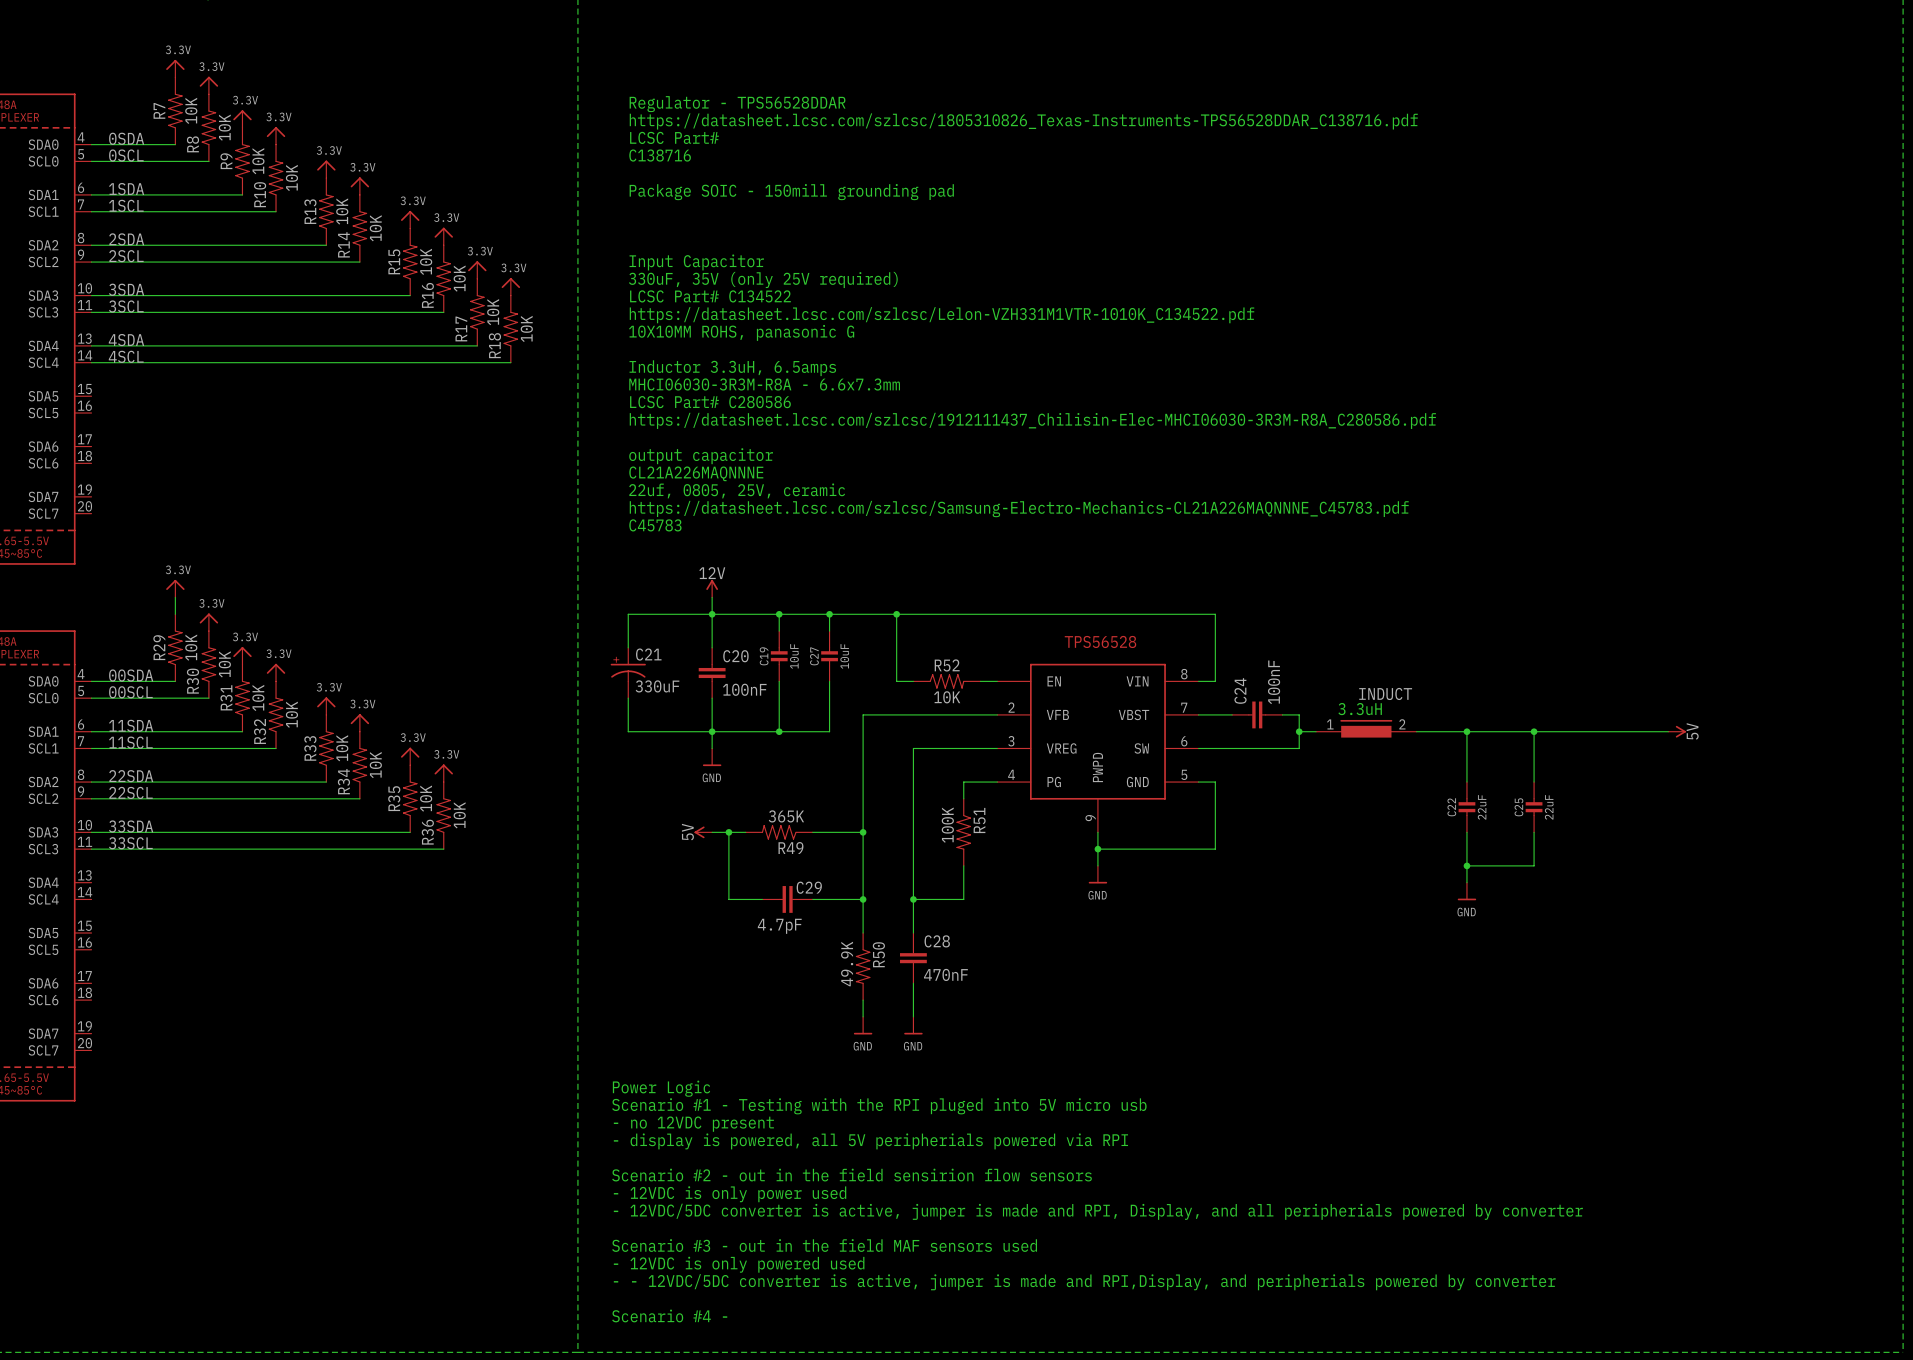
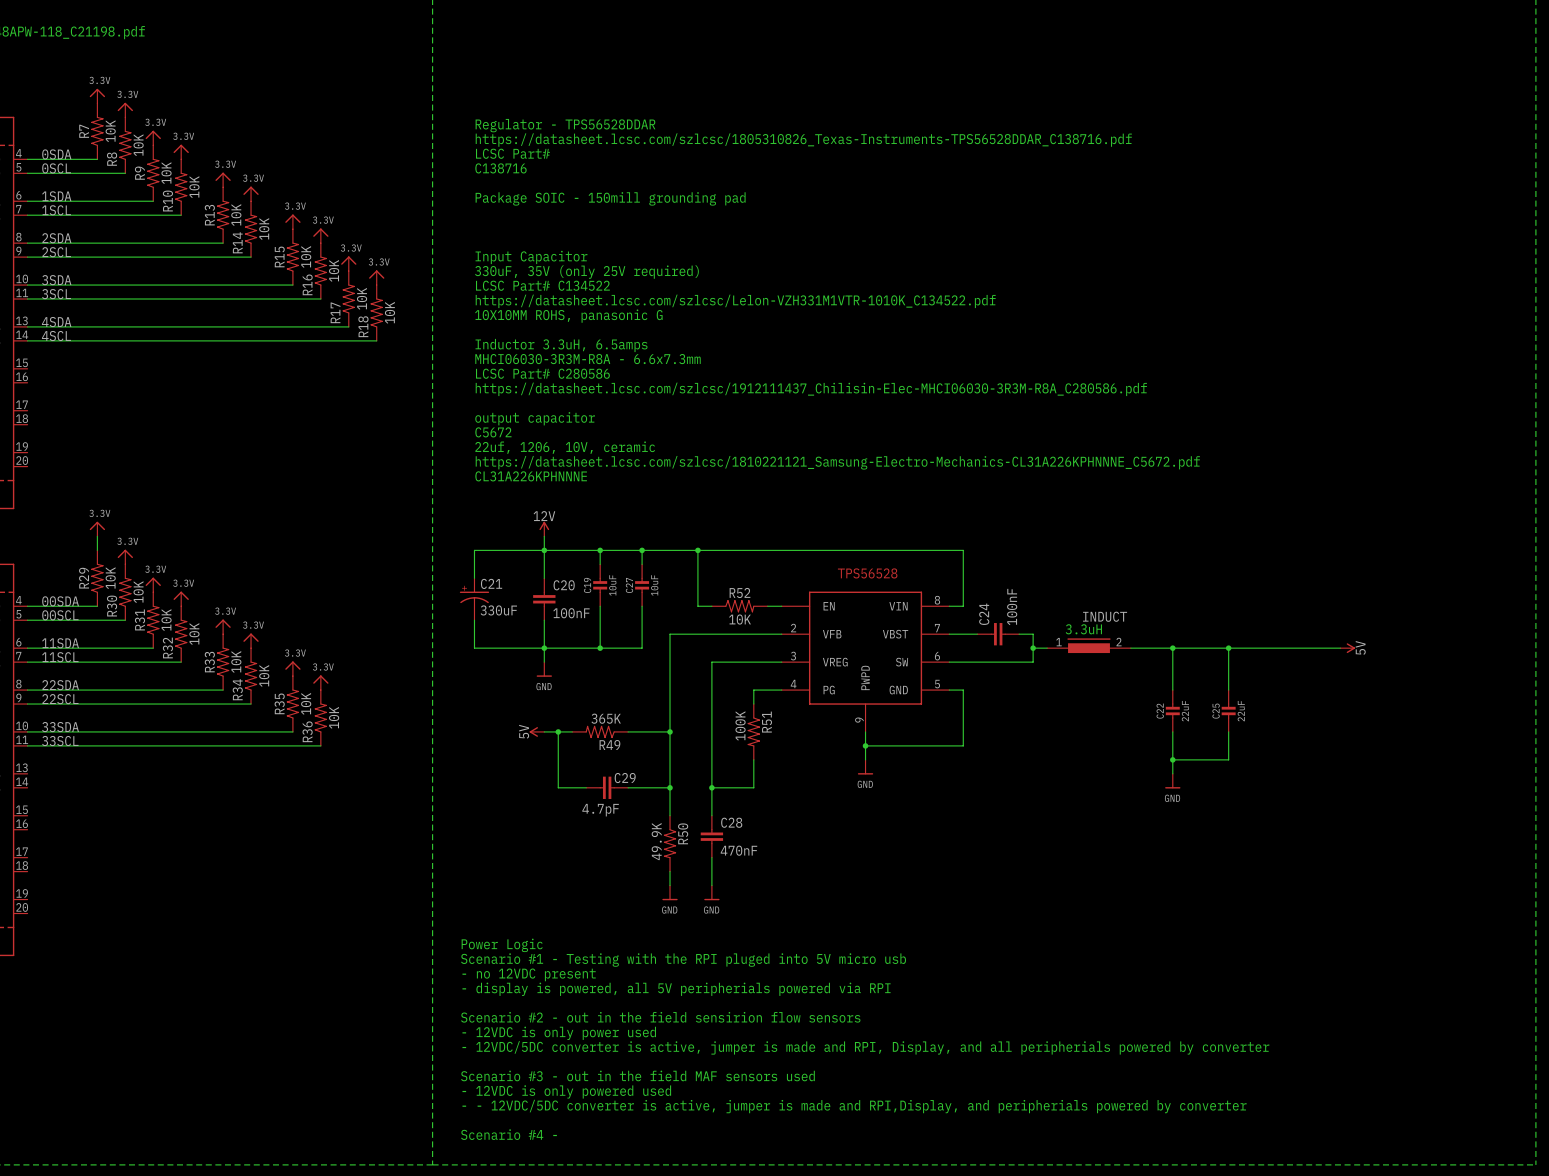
text: CL21A226MAQNNNE (696, 473) -> C5672 (493, 432)
text: 22uf, 0805, 25V, ceramic (737, 490) -> 22uf, 1206, 10V, ceramic (565, 447)
text: https://datasheet.lcsc.com/szlcsc/Samsung-Electro-Mechanics-CL21A226MAQNNNE_C45783.pdf (1019, 509) -> https://datasheet.lcsc.com/szlcsc/1810221121_Samsung-Electro-Mechanics-CL31A226KPHNNNE_C5672.pdf (837, 462)
text: C45783 (655, 525) -> CL31A226KPHNNNE (531, 476)

